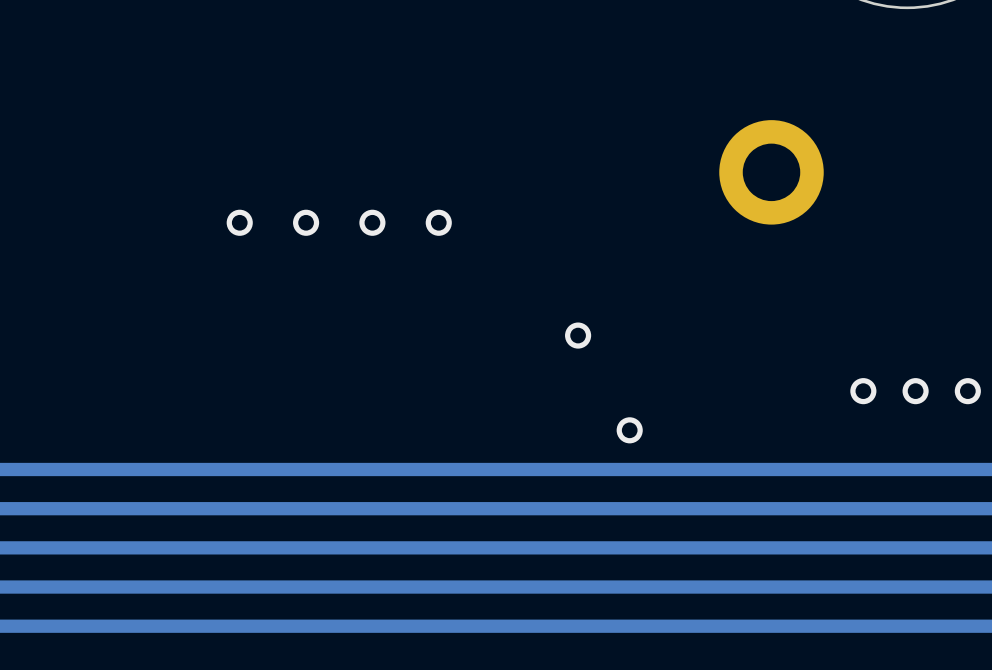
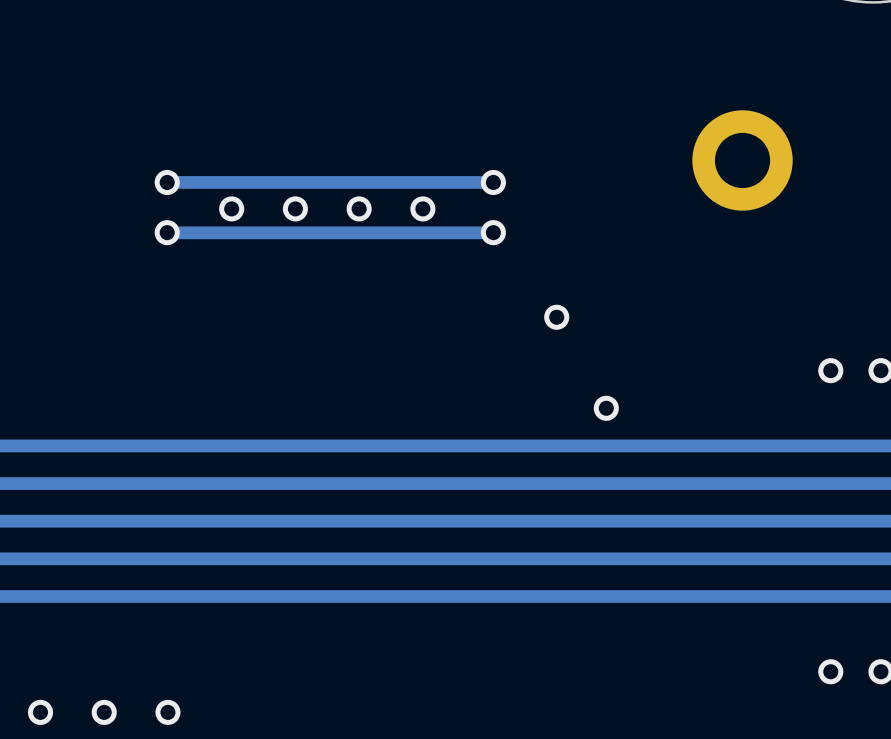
via: none -> (167, 182)
track: none -> (493, 182) (167, 182)
via: none -> (493, 182)
via: none -> (167, 232)
track: none -> (493, 232) (167, 232)
via: none -> (493, 232)

